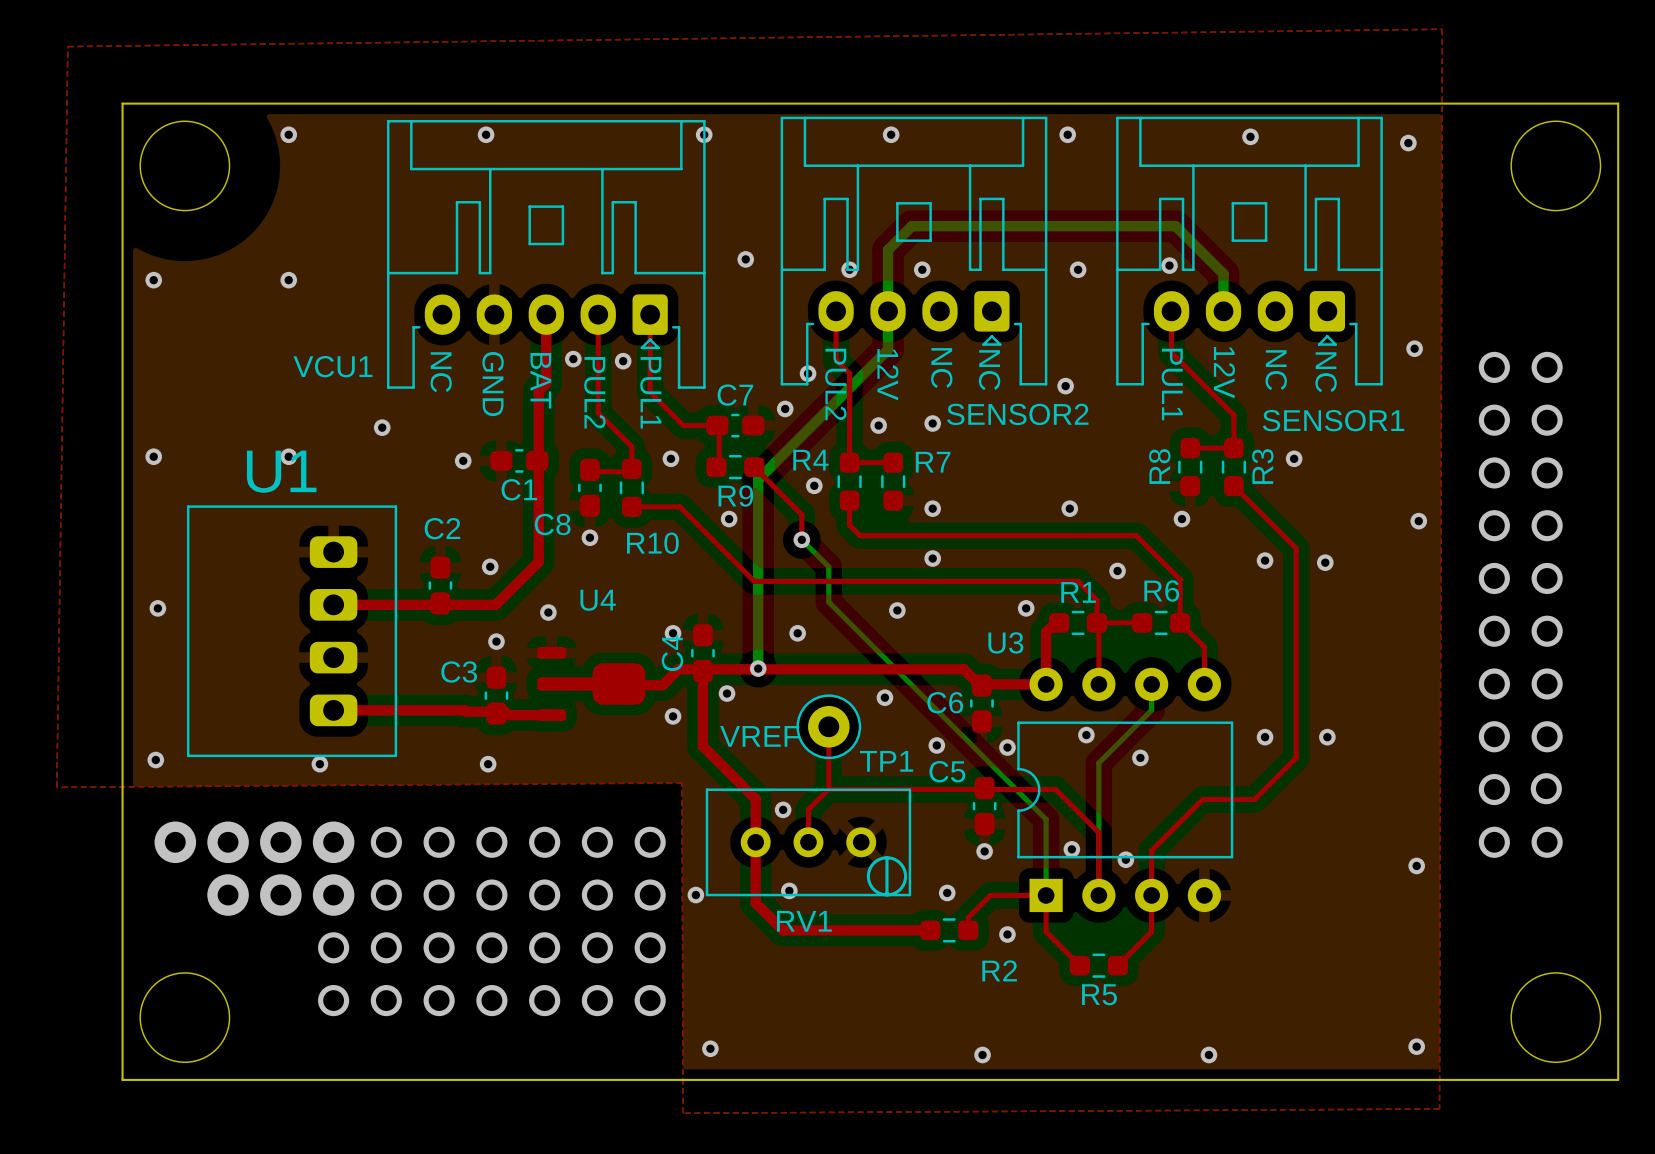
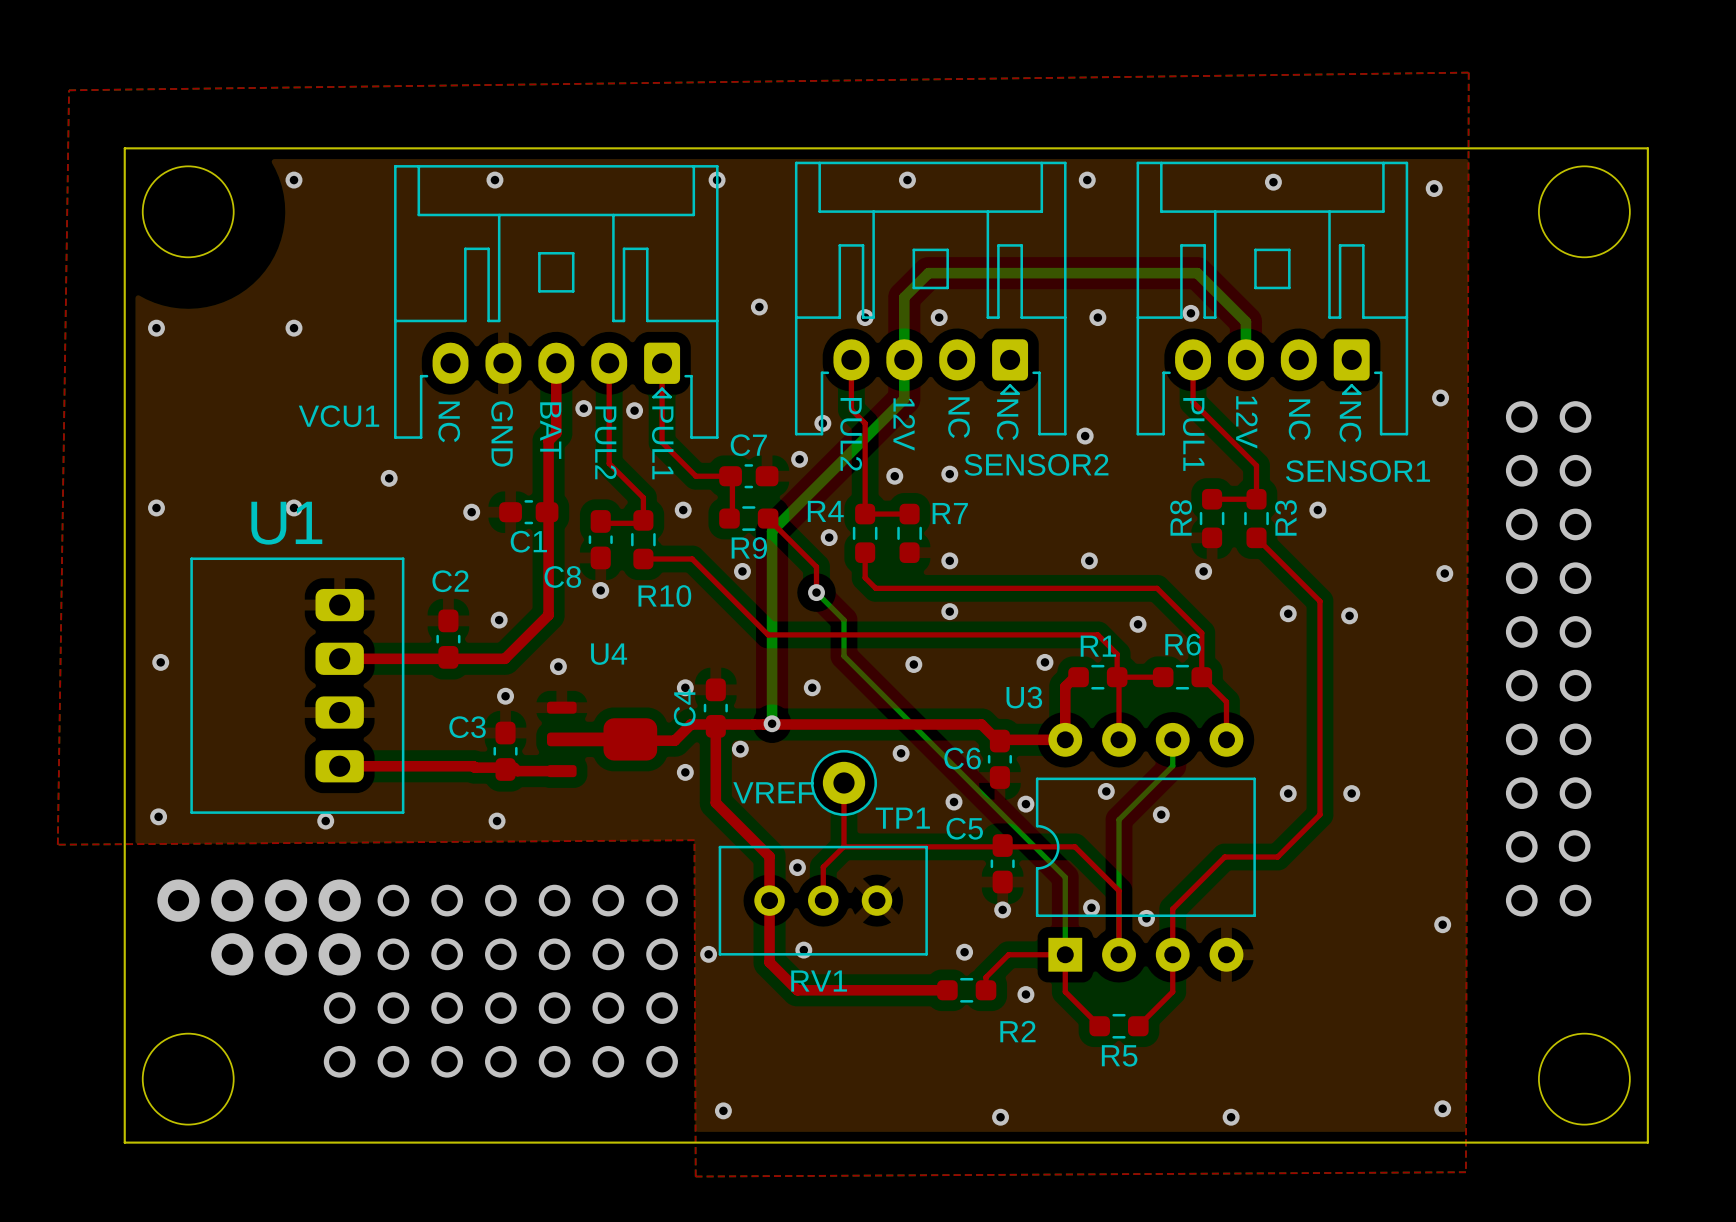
drawing: [866, 856, 908, 897] -> none
line: (886, 857) (886, 894) -> none

